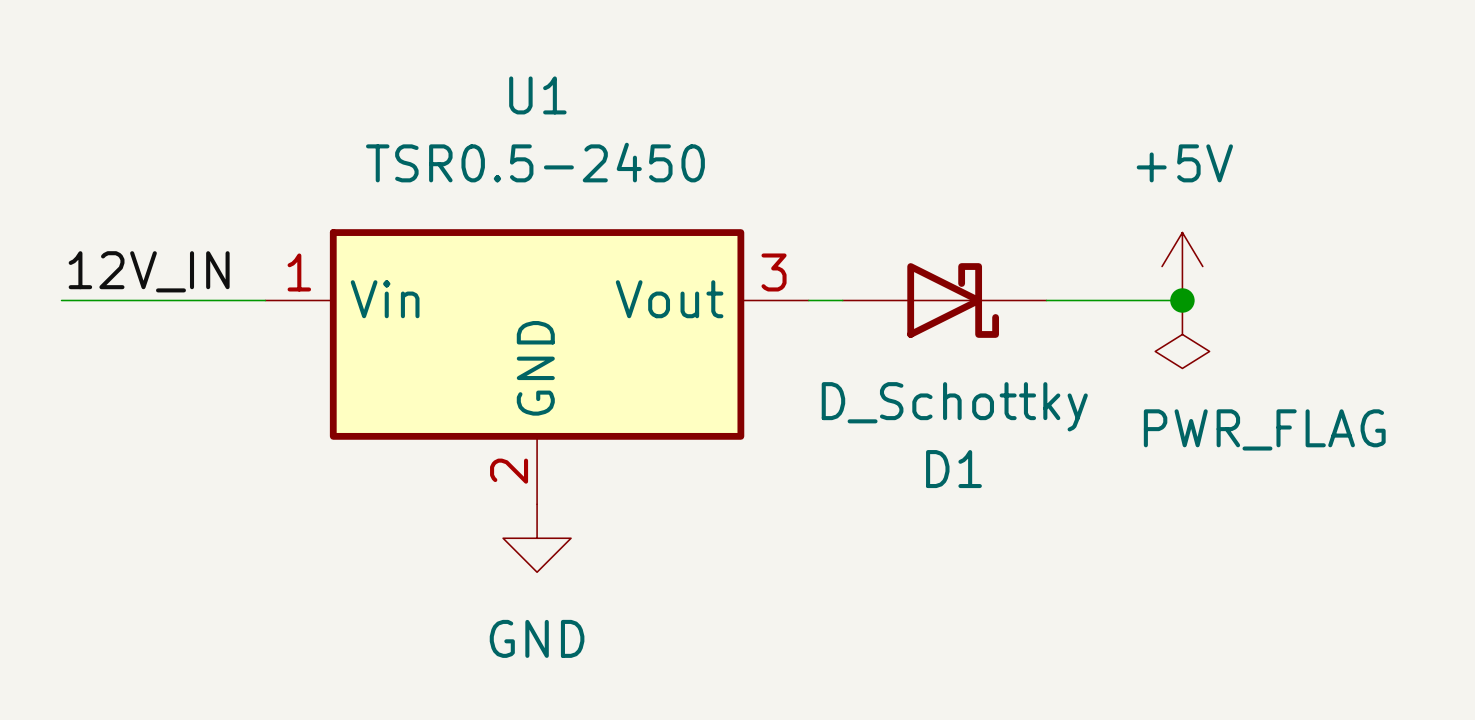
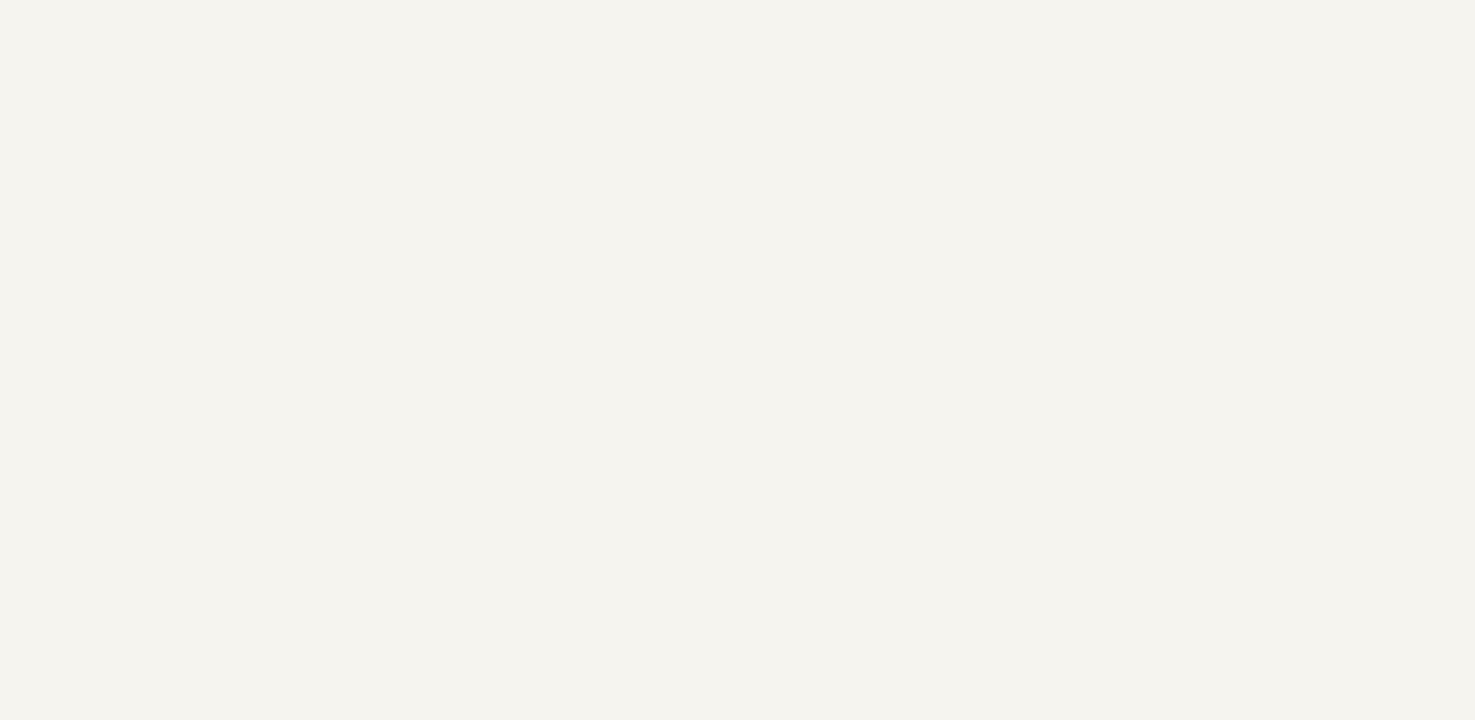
power symbol: +5V (1182, 266) -> none
label: 12V_IN (149, 271) -> none
wire: (61, 300) (265, 300) -> none
wire: (808, 300) (842, 300) -> none
D1: D_Schottky (944, 300) -> none
wire: (1046, 300) (1182, 300) -> none
junction: (1182, 300) -> none
power symbol: PWR_FLAG (1182, 334) -> none
U1: TSR0.5-2450 (537, 366) -> none
power symbol: GND (537, 538) -> none

